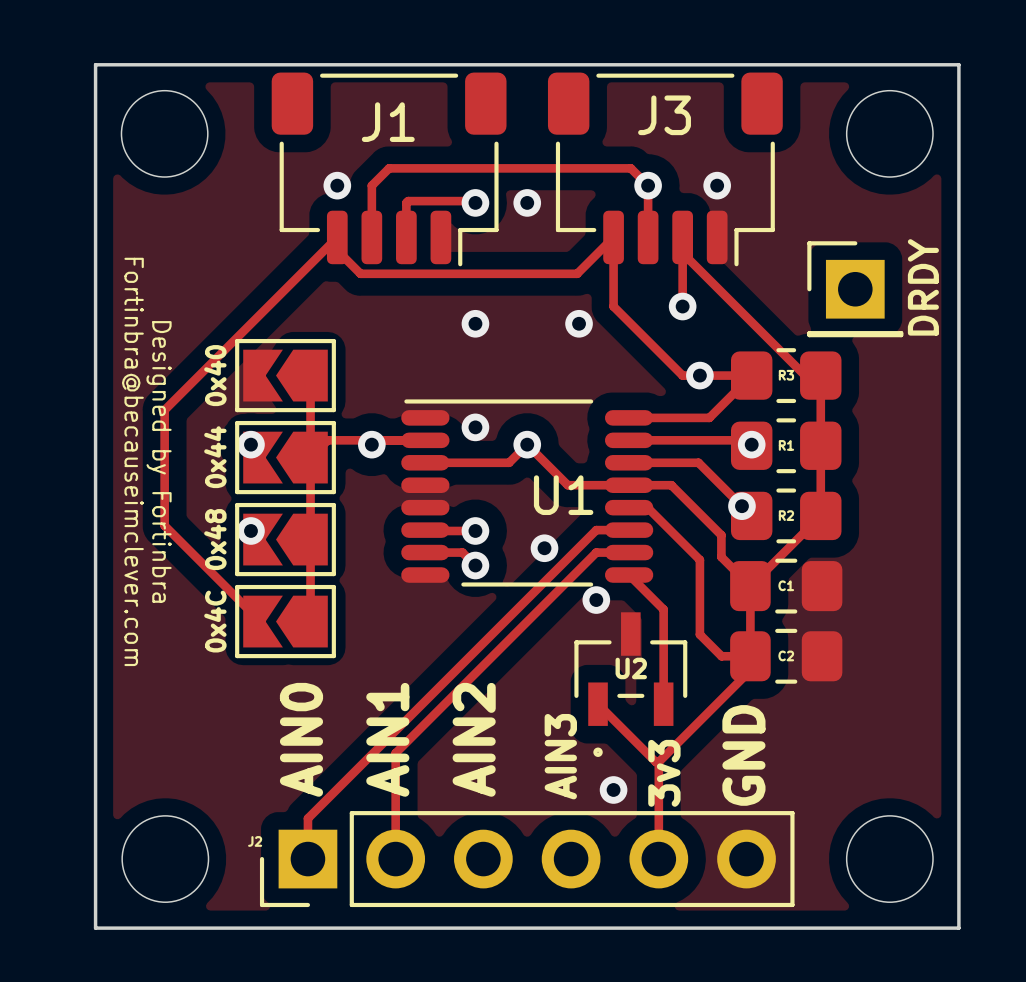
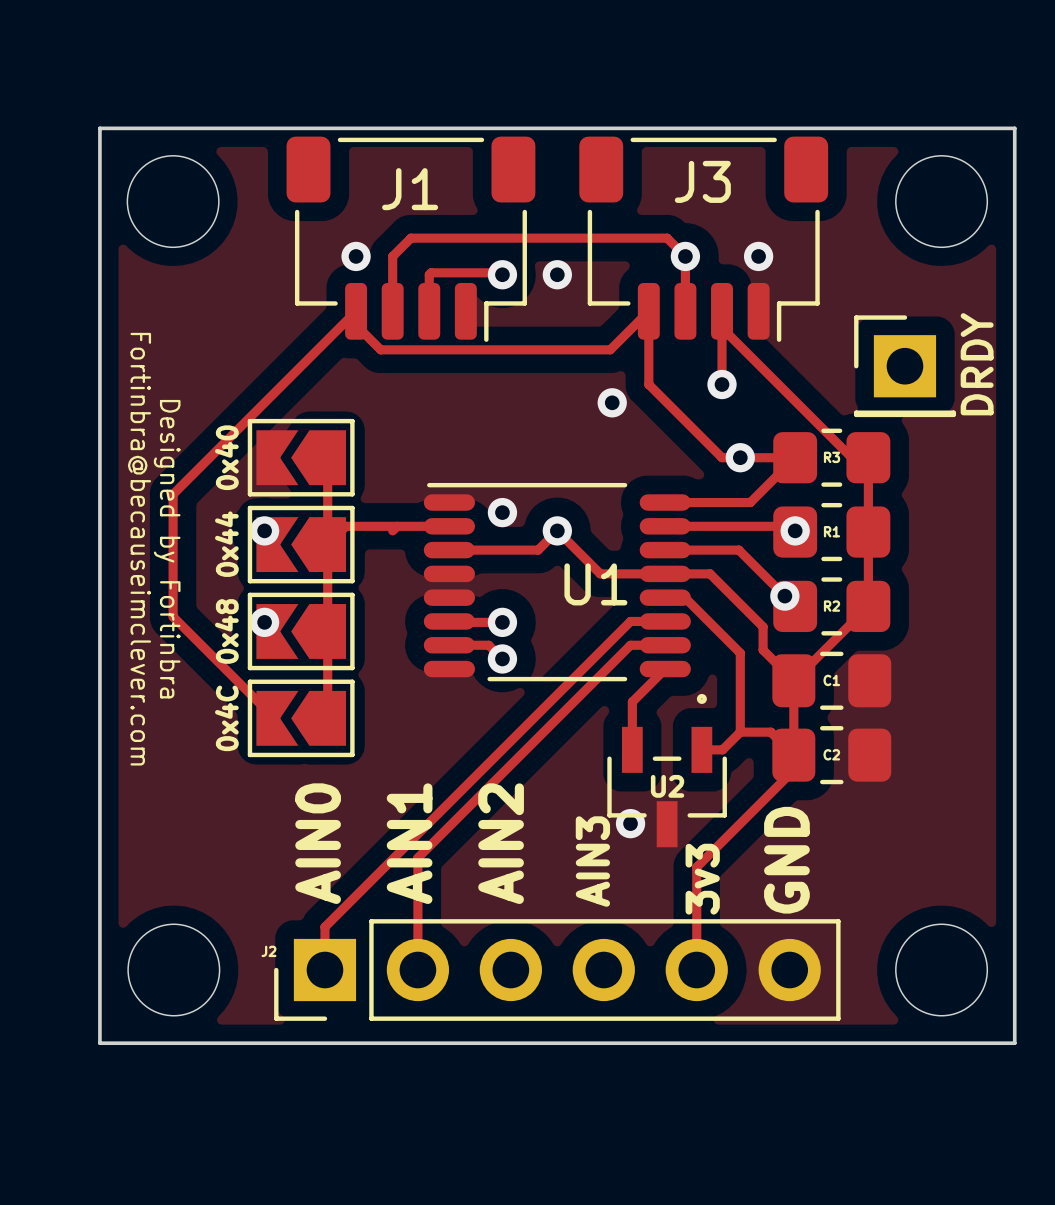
via: (475, 323) -> none
via: (371, 444) -> none
via: (544, 548) -> none
track: (629, 575) (663, 609) (663, 704) -> (665, 669) (632, 701) (632, 749)
via: (596, 600) -> none
track: (699, 634) (721, 656) (750, 656) -> (701, 749) (722, 749) (740, 732) (770, 732) (793, 755)
U2 rotation: 0° (630, 684) -> 180° (667, 770)
track: (598, 704) (655, 762) (658, 762) -> none
via: none -> (630, 823)
via: (613, 789) -> none

